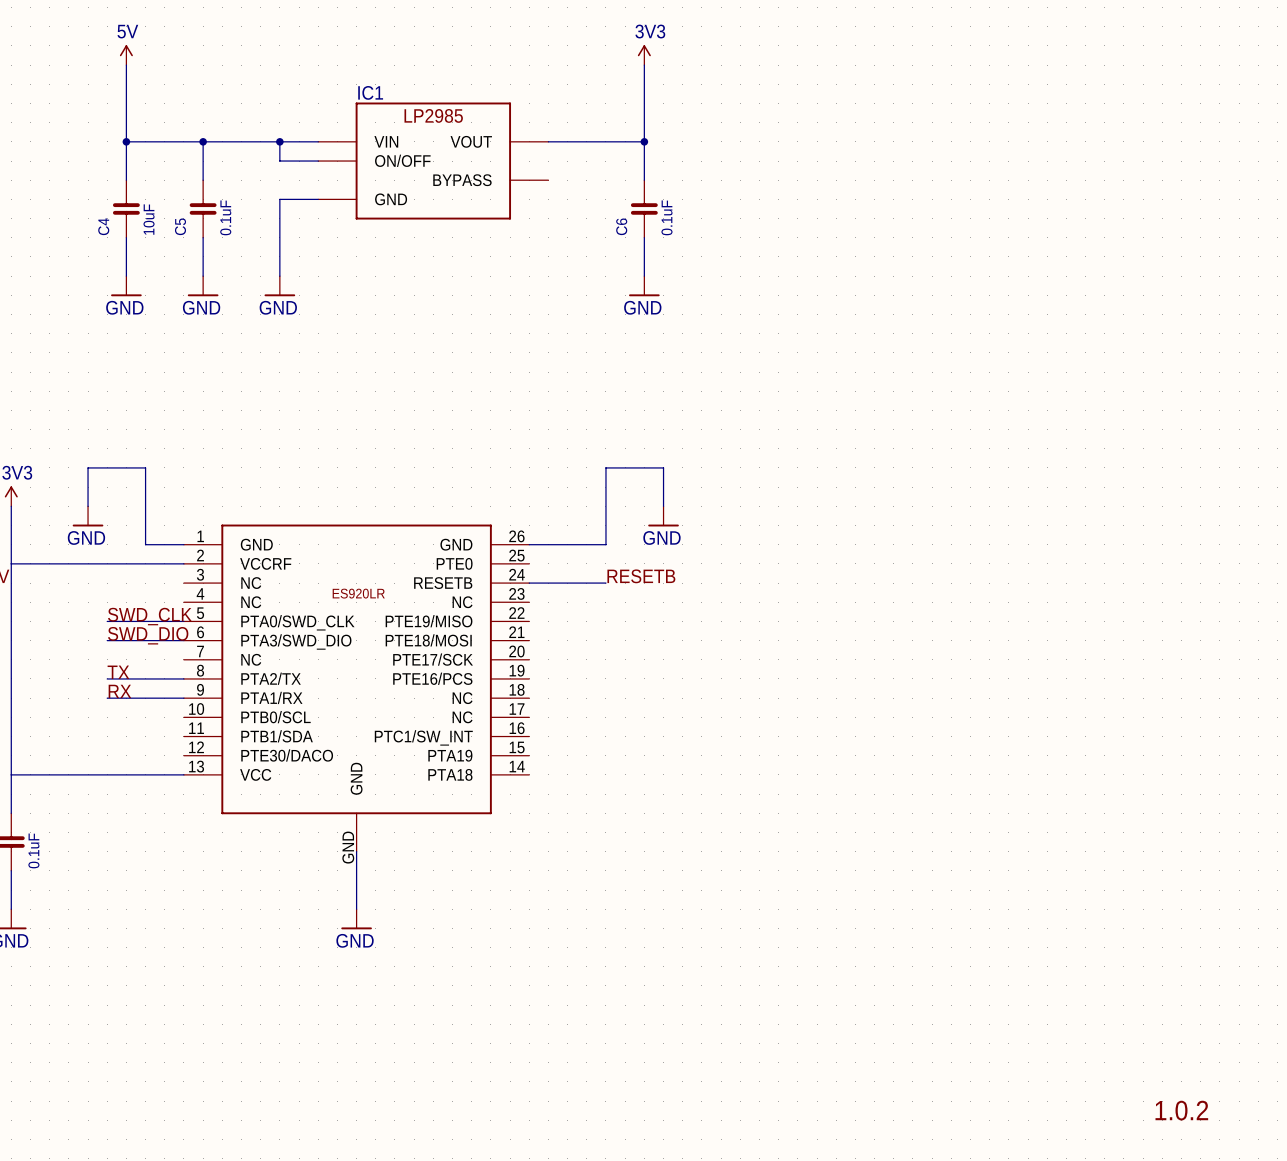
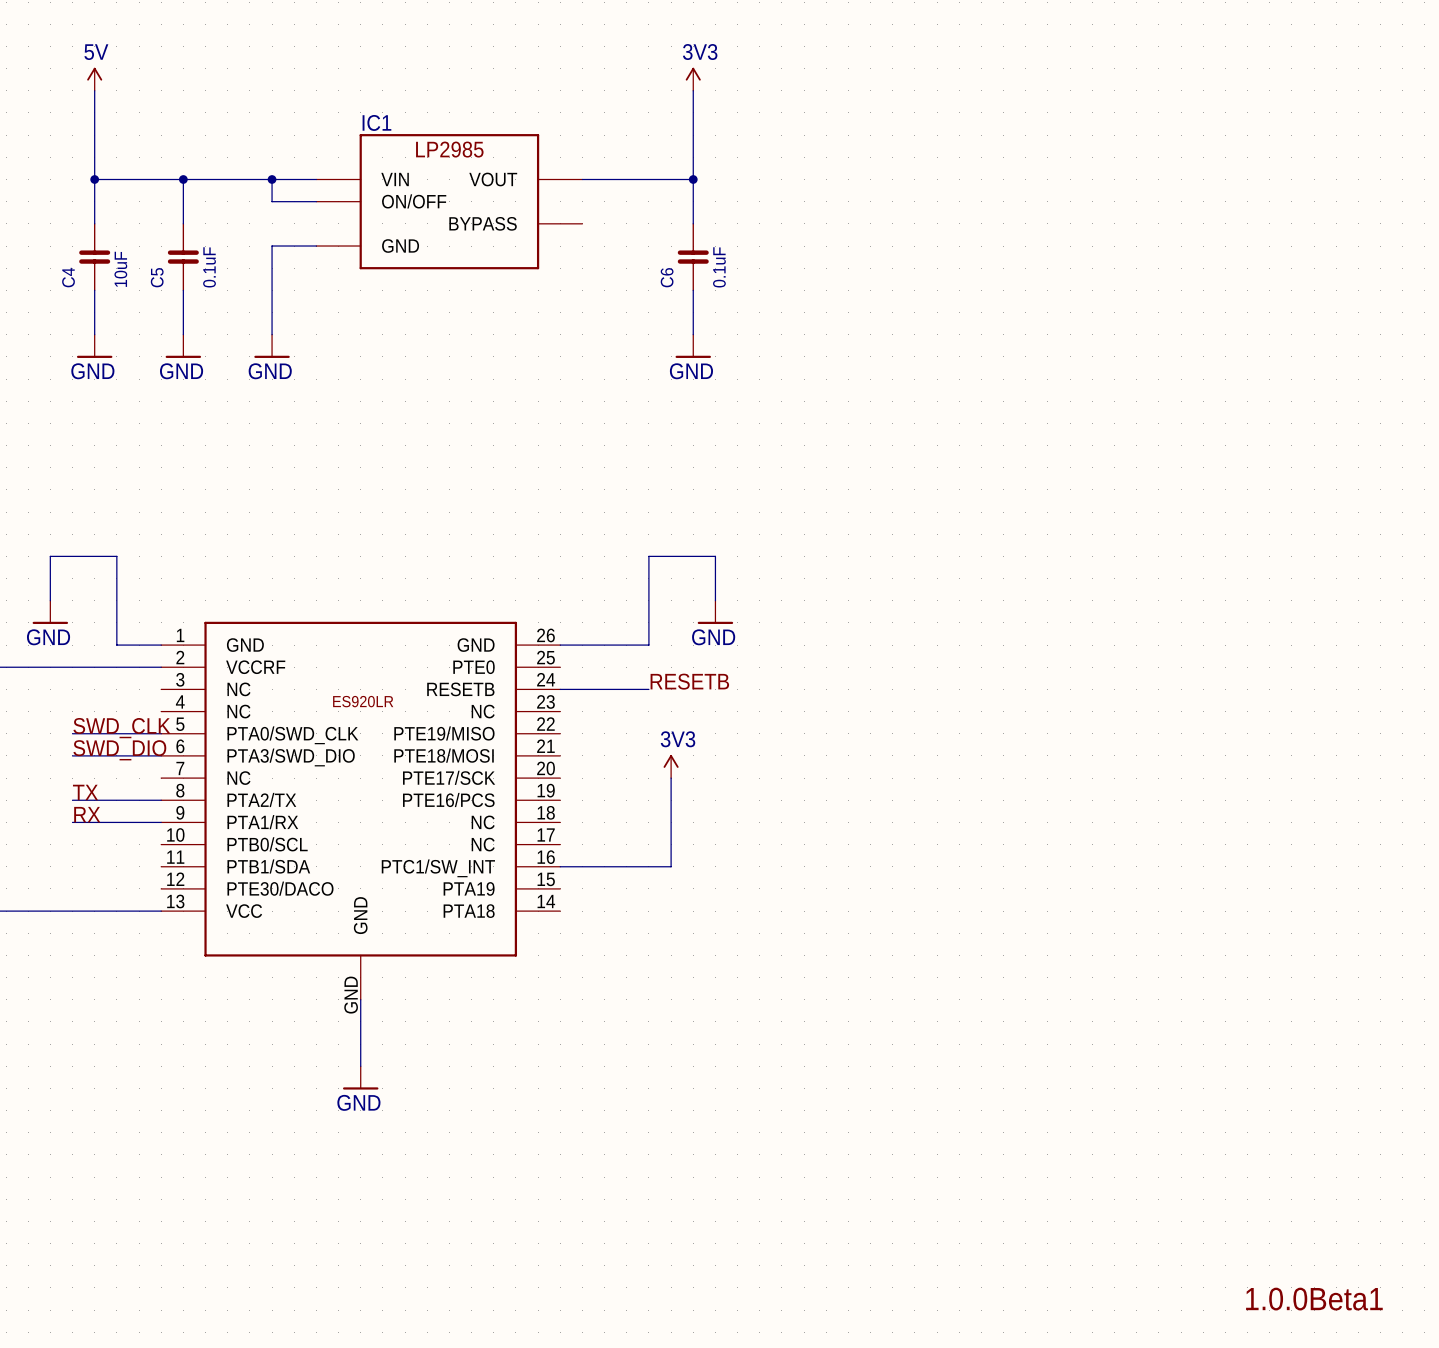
power symbol: none -> 3V3 (671, 766)
wire: none -> (671, 778) (671, 866) (560, 866)
text: 1.0.2 (1181, 1110) -> 1.0.0Beta1 (1314, 1299)

